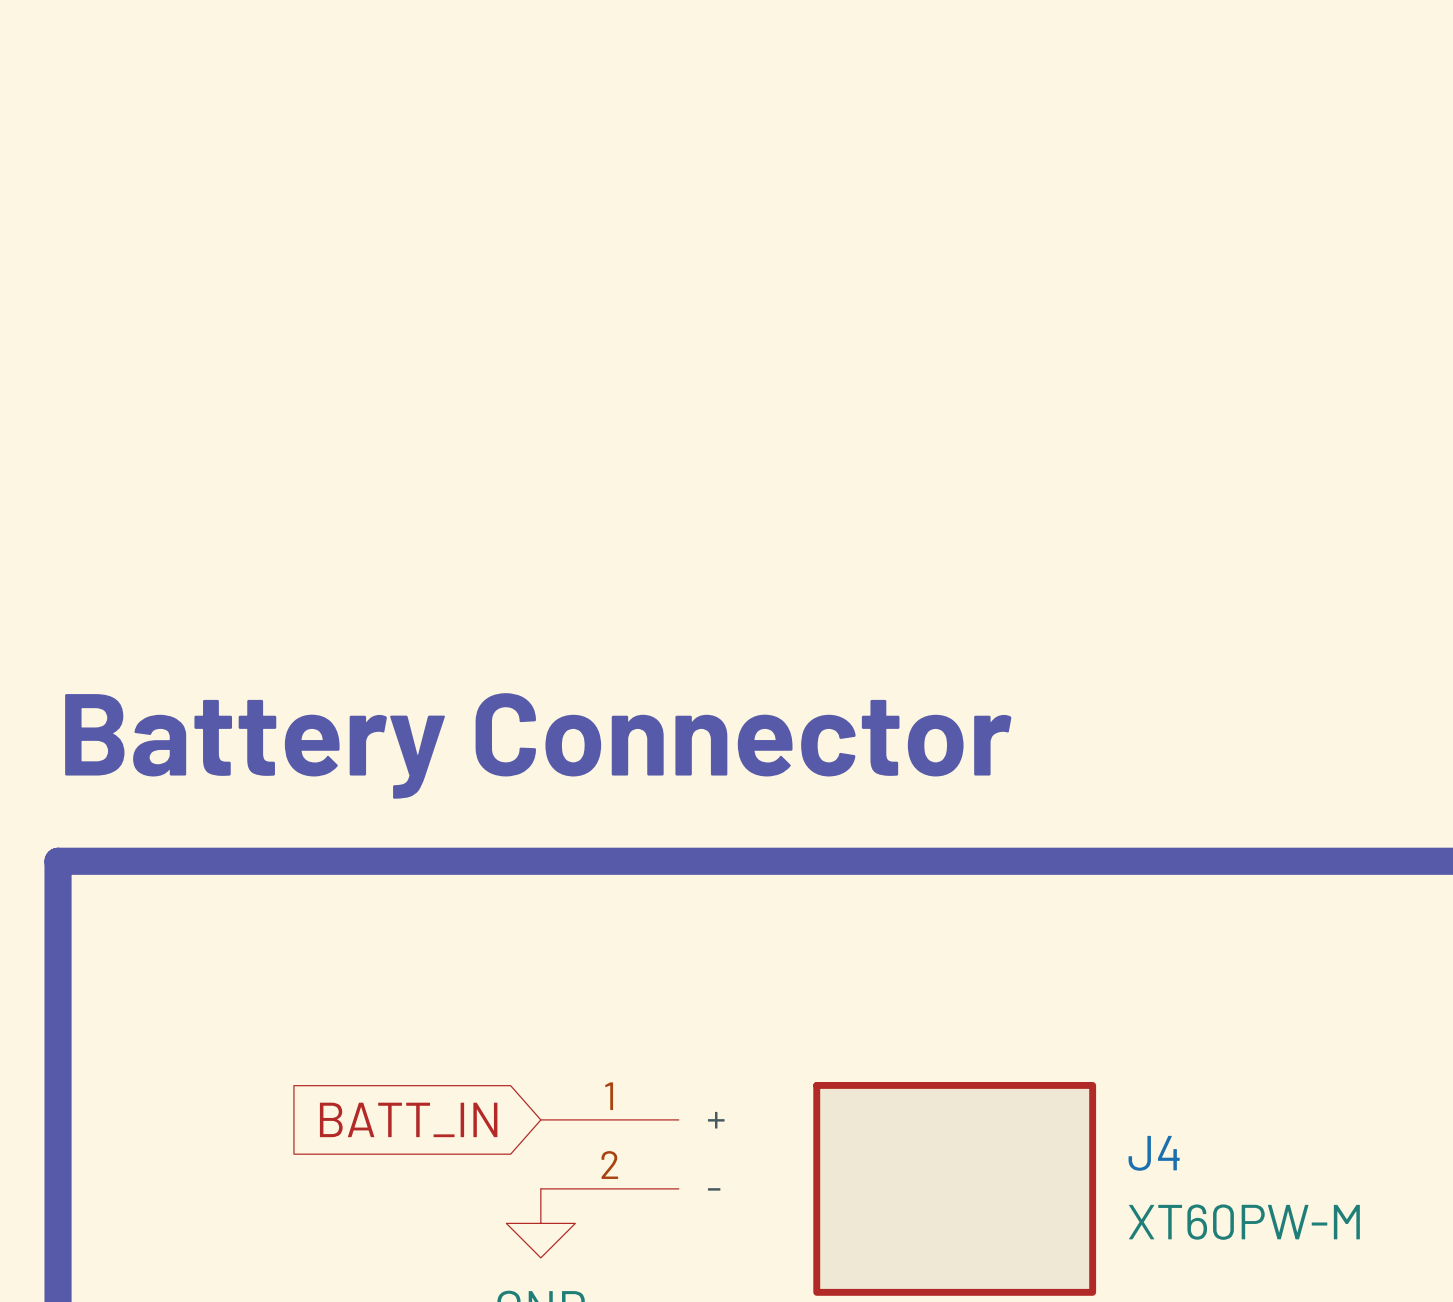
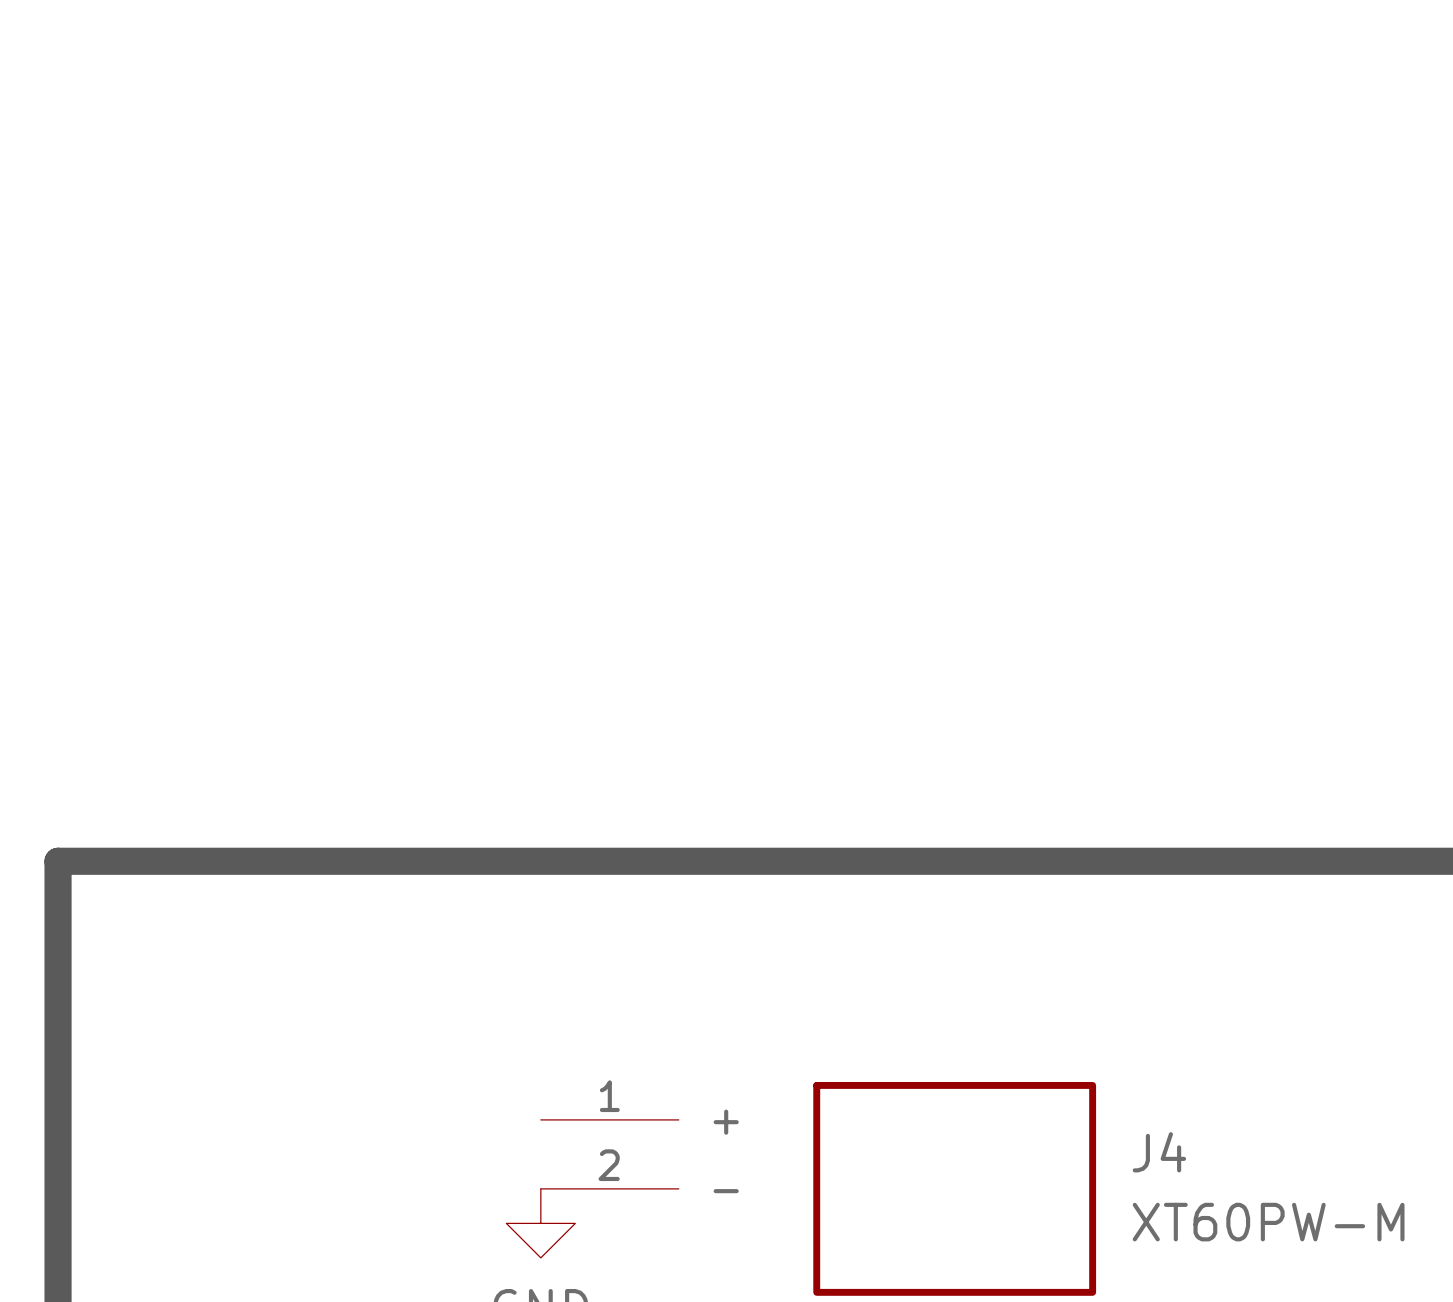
text: Battery Connector (538, 745) -> none
global label: BATT_IN (408, 1119) -> none

